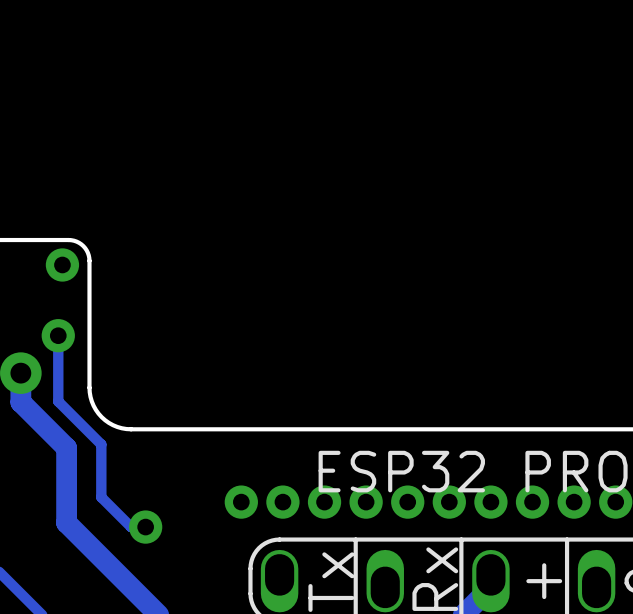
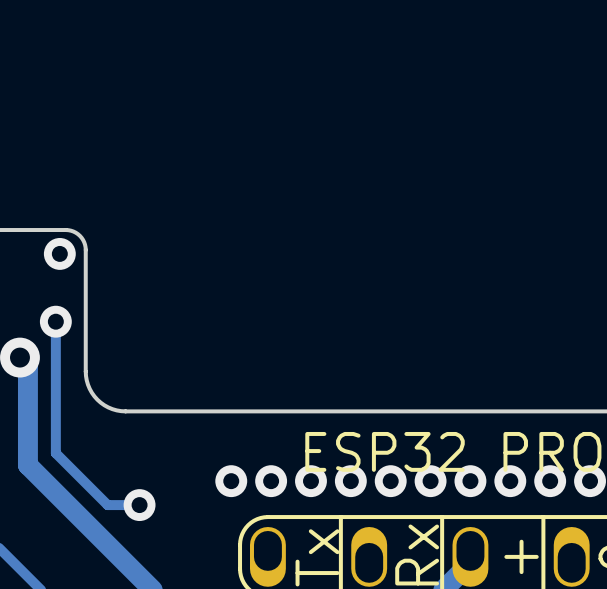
track: (20, 373) (20, 402) (66, 448) (66, 522) -> (19, 357) (27, 365) (27, 465) (63, 501)
track: (58, 401) (101, 444) (101, 497) (131, 527) -> (55, 384) (55, 453) (107, 505) (125, 505)

